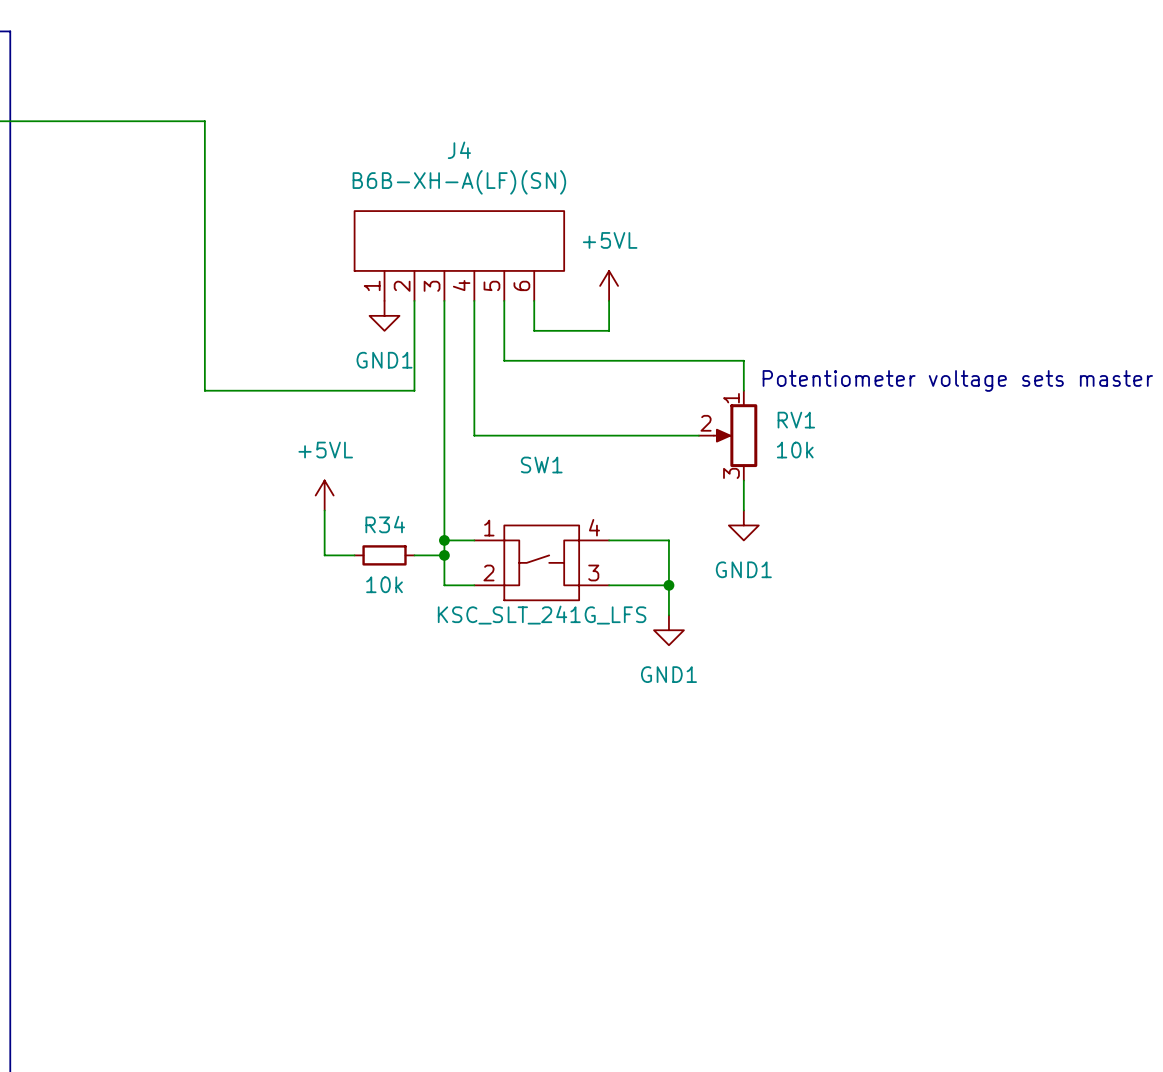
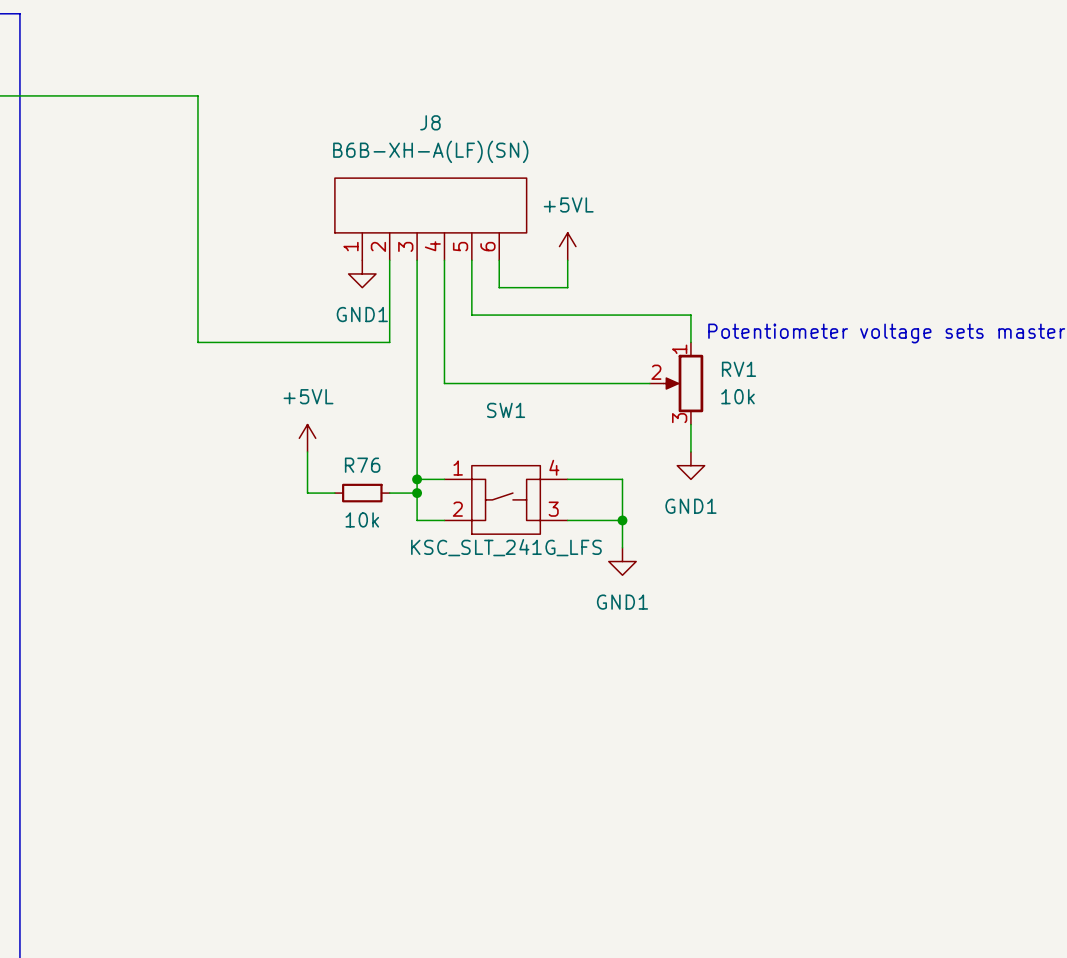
J4 name: J4 (459, 150) -> J8 (430, 122)
R34 name: R34 (385, 524) -> R76 (362, 465)

